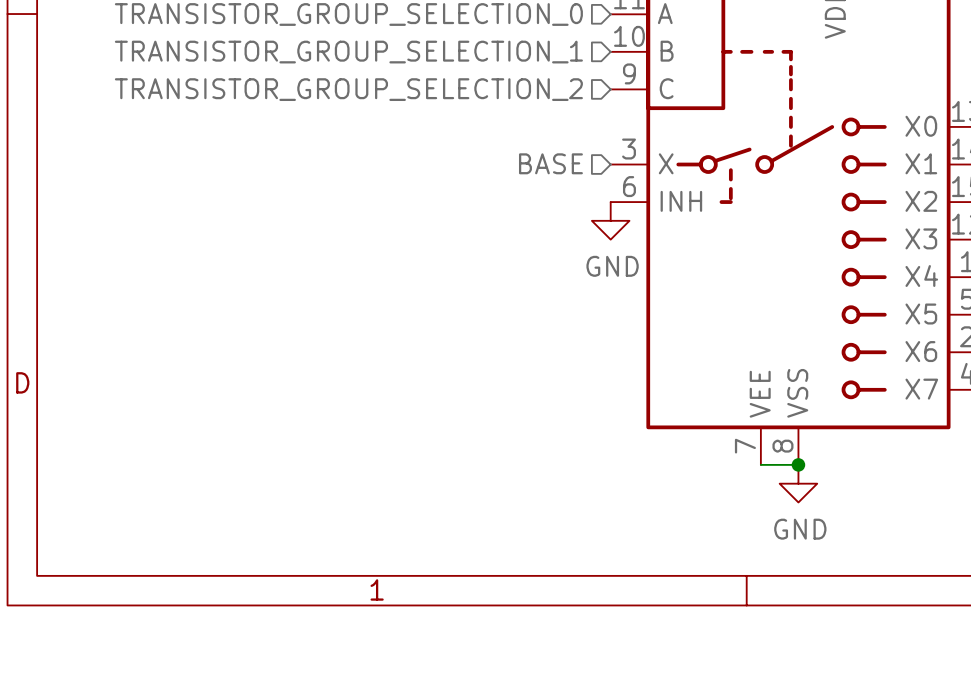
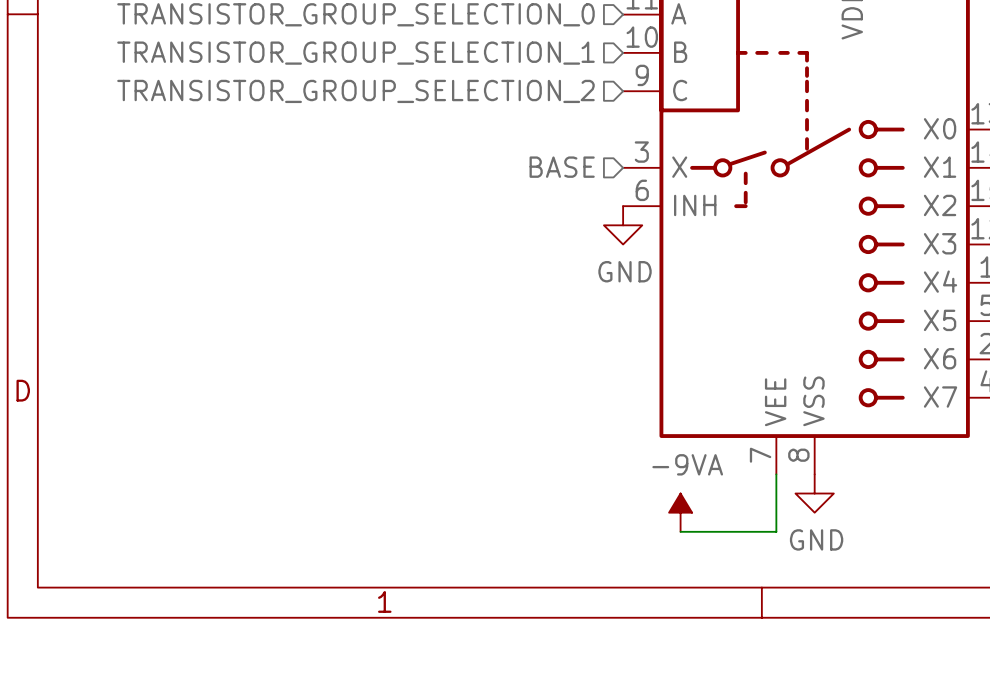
wire: (760, 464) (798, 464) -> (776, 474) (776, 531) (680, 531)
junction: (798, 464) -> none
power symbol: none -> -9VA (680, 512)

